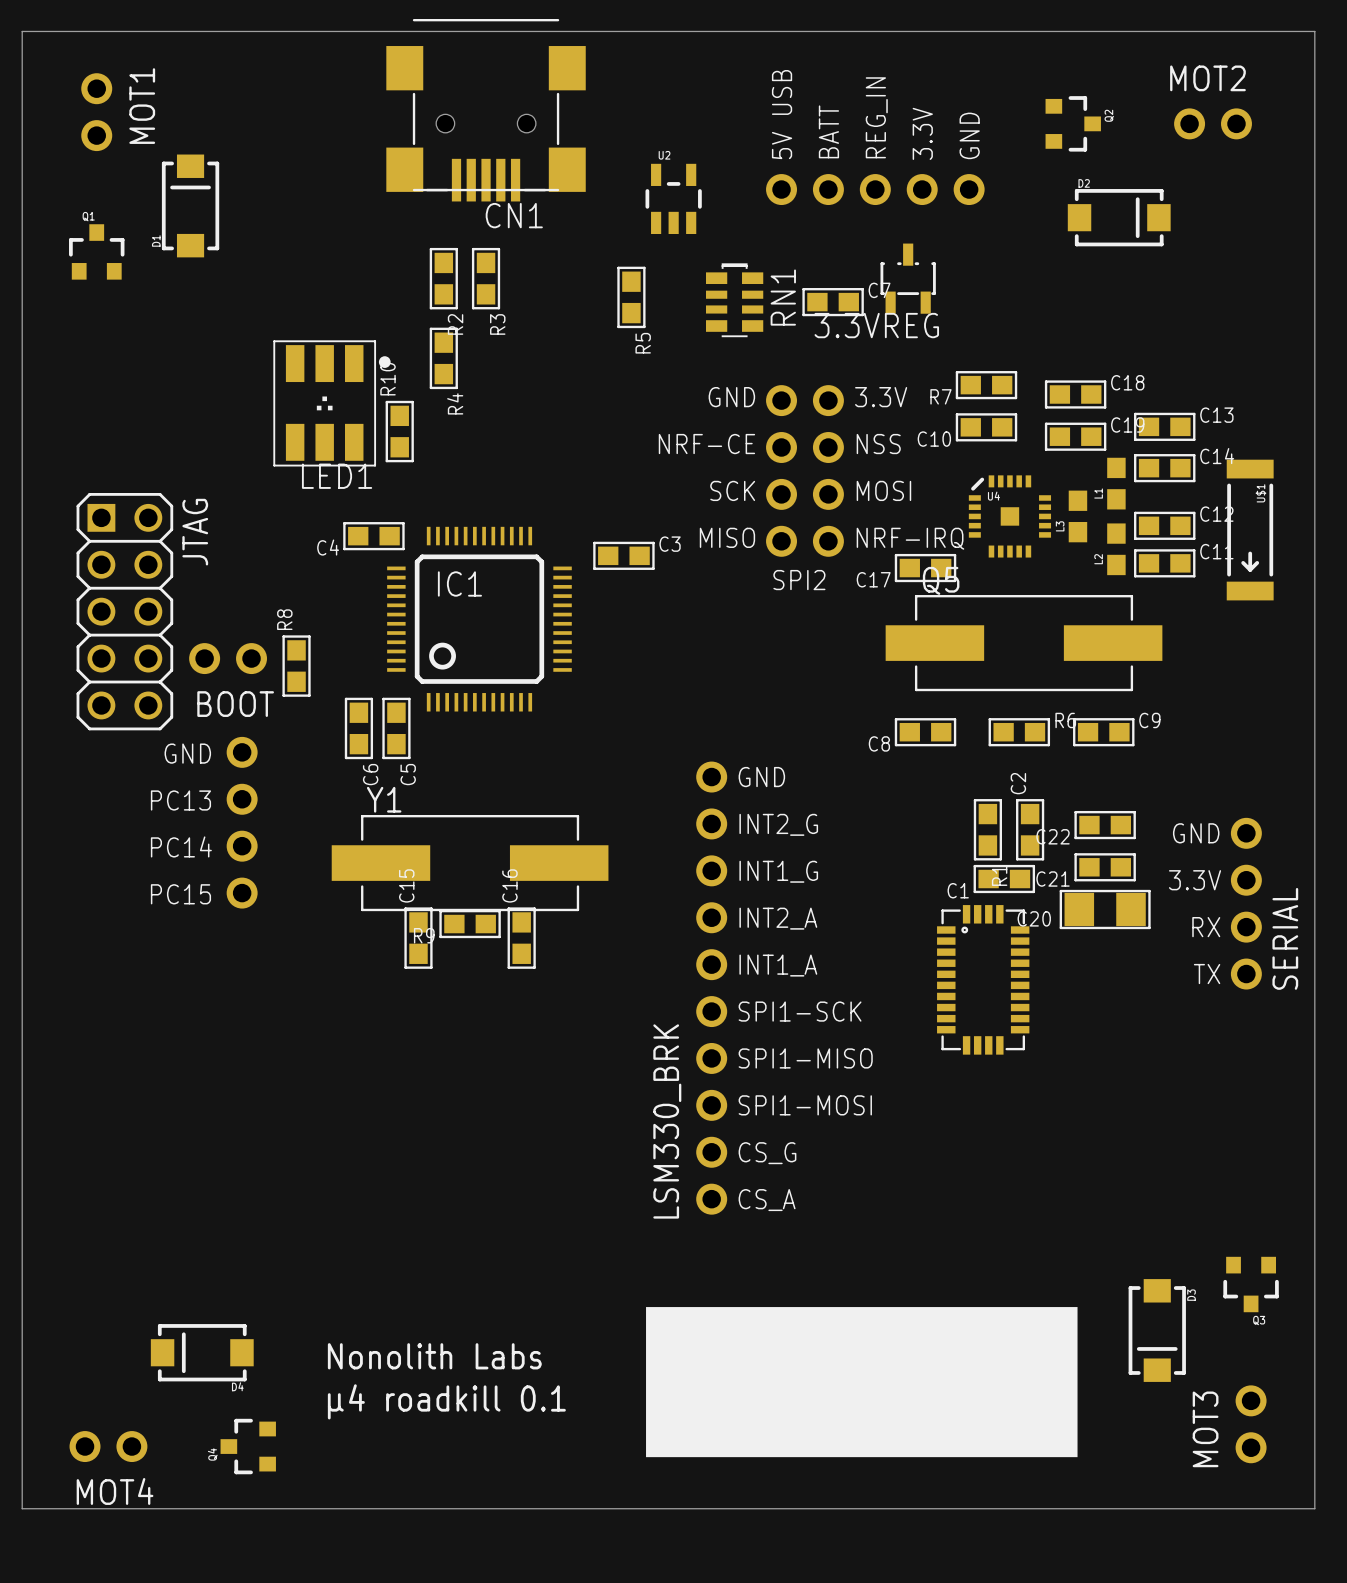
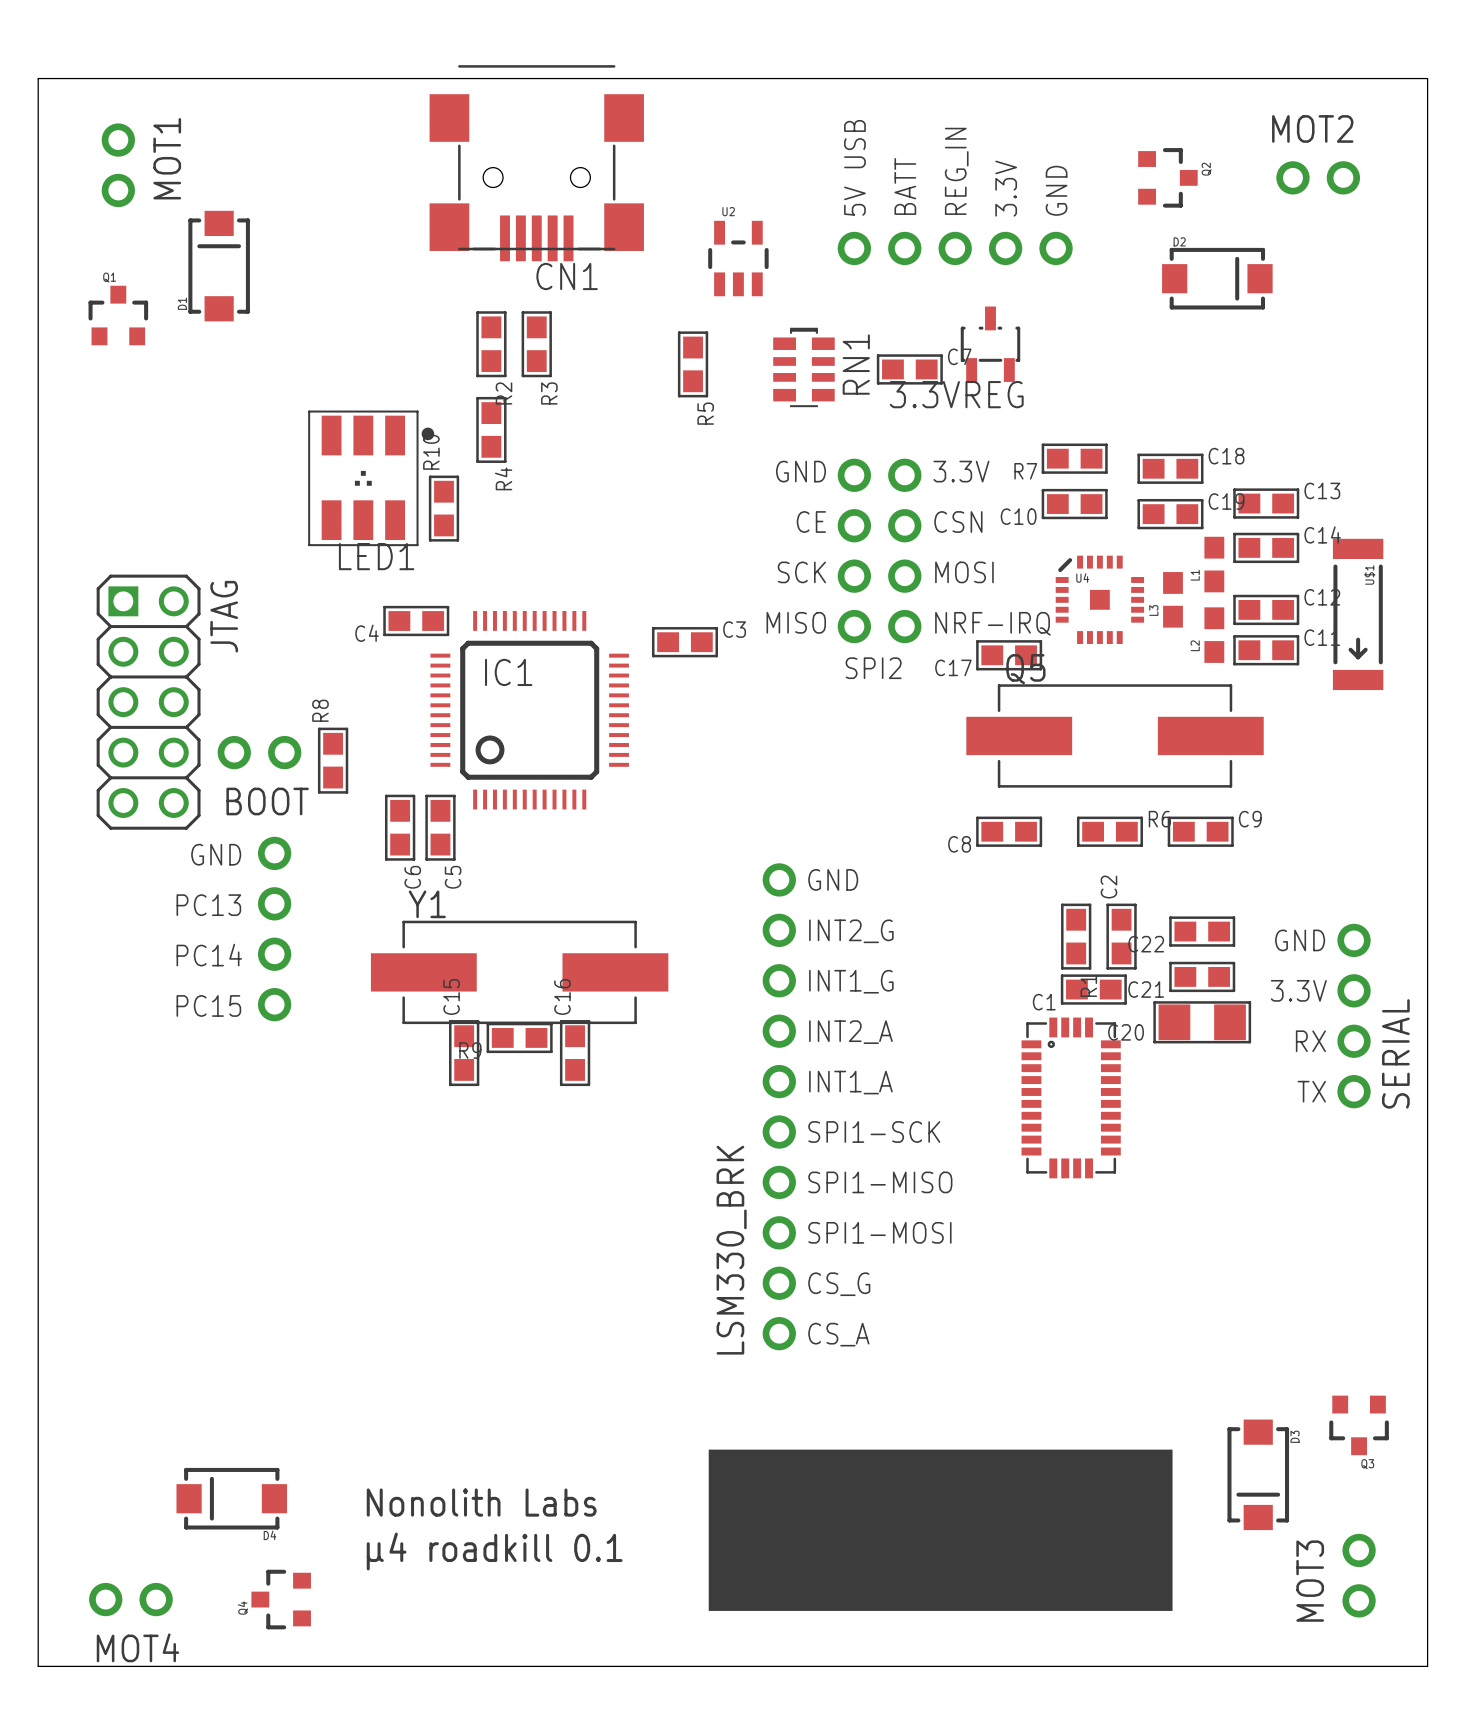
text: NRF-CE (706, 444) -> CE (811, 521)
text: NSS (878, 444) -> CSN (958, 521)

